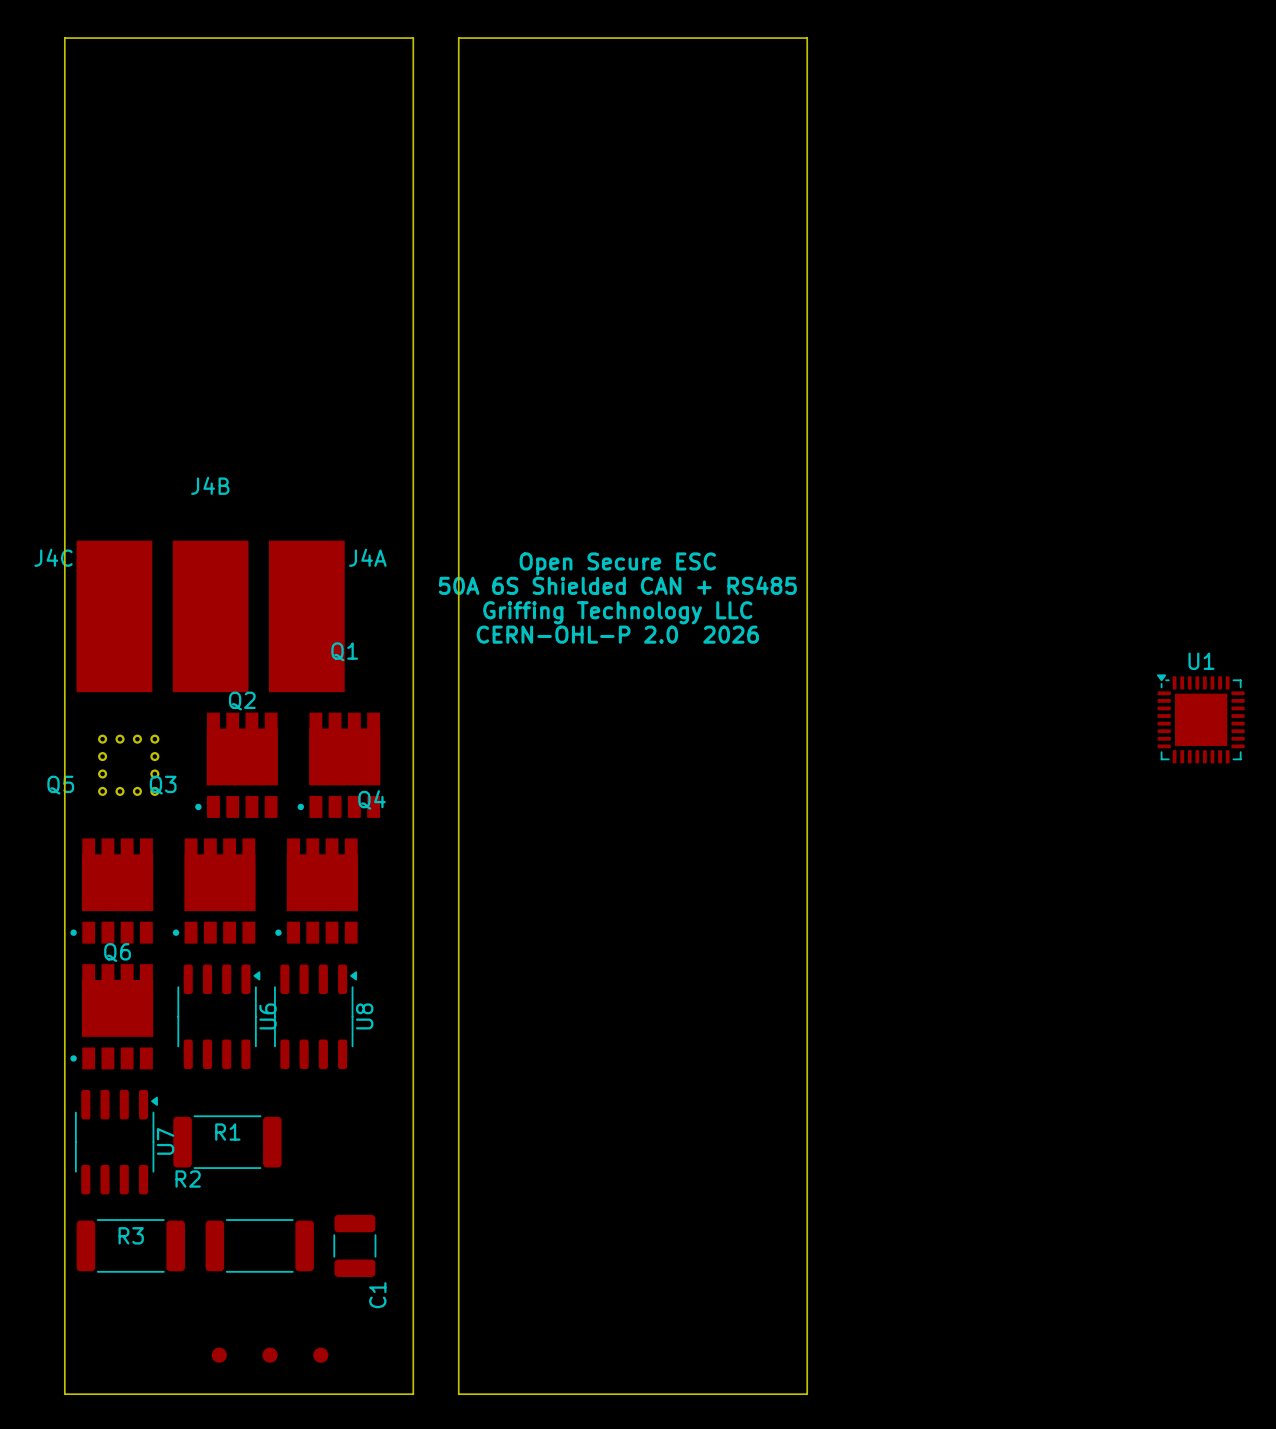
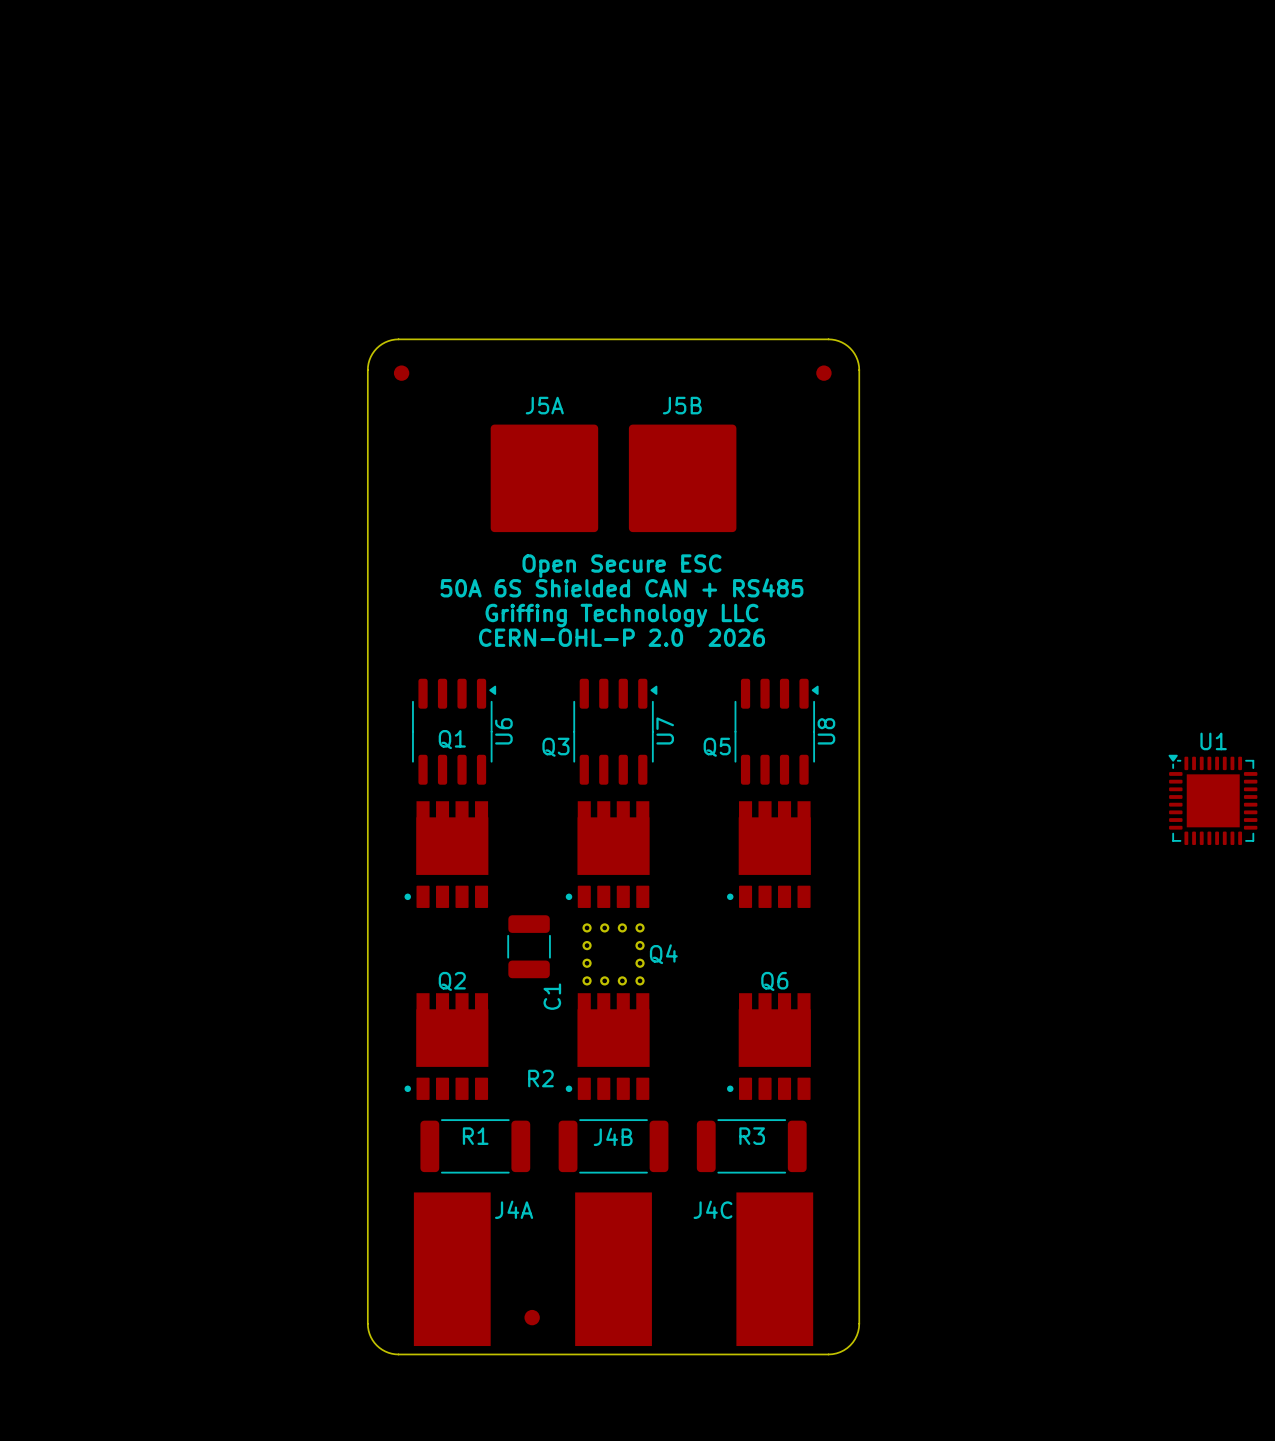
board edge: (64, 38) (413, 38) (413, 1394) (64, 1394) (64, 38) -> none
board edge: (458, 38) (807, 38) (807, 1394) (458, 1394) (458, 38) -> (398, 339) (388, 341) (376, 348) (370, 356) (367, 370) (367, 1323) (370, 1337) (382, 1349) (398, 1354) (828, 1354) (840, 1352) (847, 1348) (855, 1339) (859, 1323) (859, 370) (856, 356) (844, 344) (828, 339) (398, 339)
part: none -> (401, 373)
part: none -> (823, 373)
J5A: none -> (544, 478)
J5B: none -> (682, 478)
J4C position: (114, 616) -> (774, 1269)
J4B position: (210, 616) -> (613, 1269)
J4A position: (306, 616) -> (452, 1269)
U1 position: (1200, 718) -> (1212, 799)
part: (128, 765) -> none
Q2 position: (236, 765) -> (446, 1046)
Q1 position: (338, 765) -> (446, 854)
Q5 position: (111, 891) -> (768, 854)
Q3 position: (214, 891) -> (607, 854)
Q4 position: (316, 891) -> (607, 1046)
part: none -> (613, 954)
Q6 position: (111, 1016) -> (768, 1046)
U6 position: (218, 1016) -> (454, 731)
U8 position: (315, 1016) -> (776, 731)
U7 position: (116, 1142) -> (615, 731)
R1 position: (227, 1142) -> (475, 1146)
R3 position: (130, 1245) -> (751, 1146)
R2 position: (259, 1245) -> (613, 1146)
C1 position: (354, 1245) -> (529, 946)
part: none -> (532, 1317)
part: (219, 1355) -> none
part: (270, 1355) -> none
part: (320, 1355) -> none

